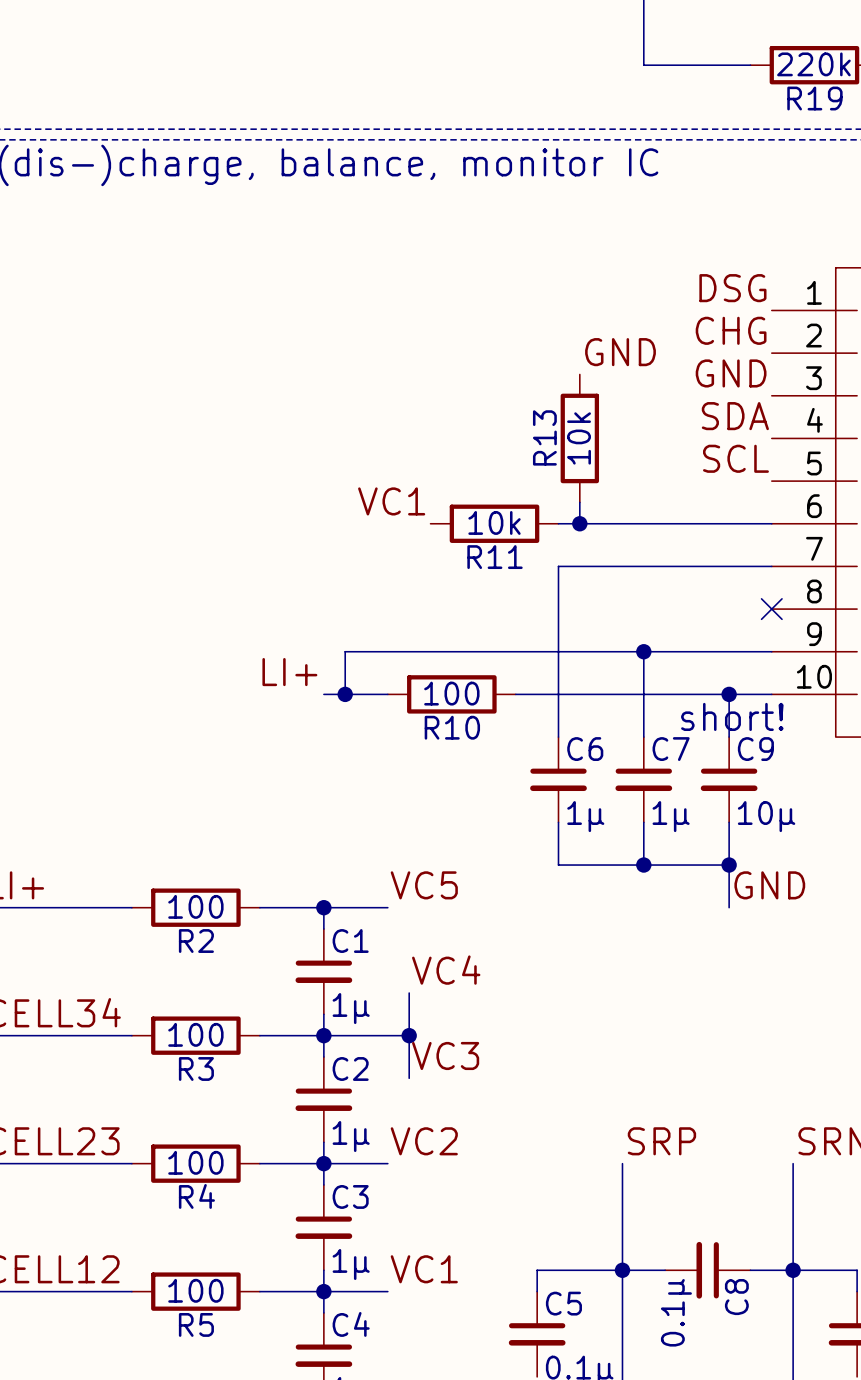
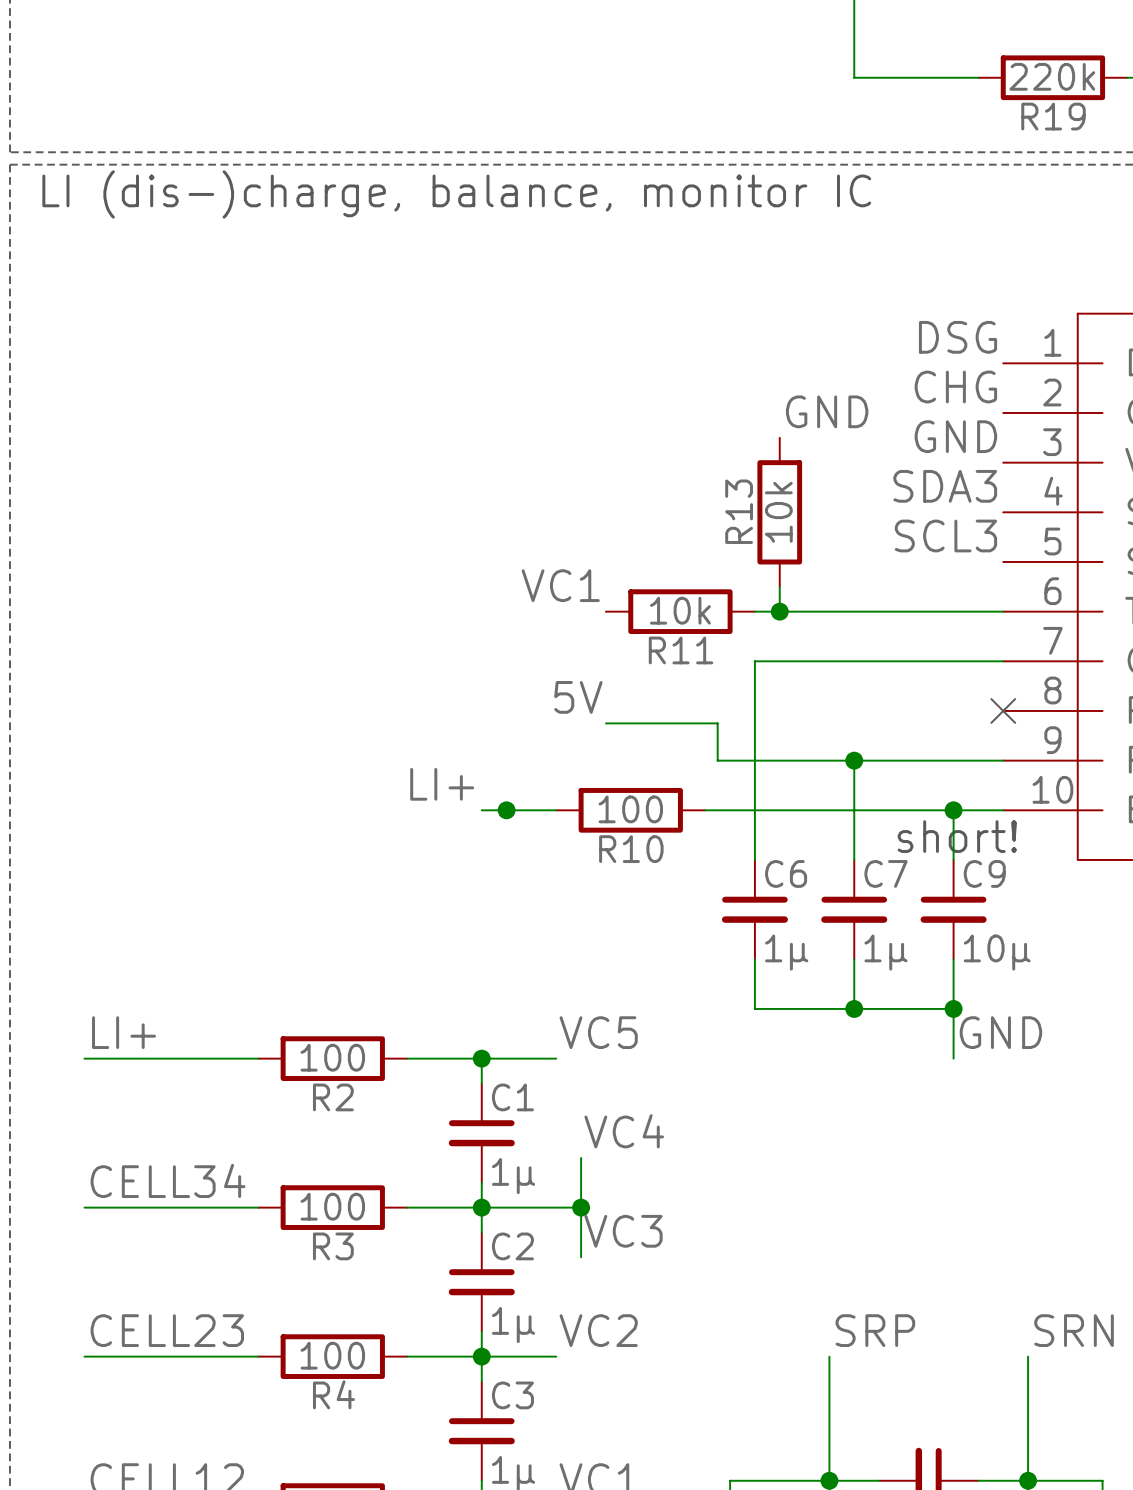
label: SDA (735, 416) -> SDA3 (945, 486)
label: SCL (735, 458) -> SCL3 (945, 535)
label: none -> 5V (578, 697)
wire: (526, 651) (345, 651) (345, 694) -> (717, 760) (717, 723) (605, 723)

